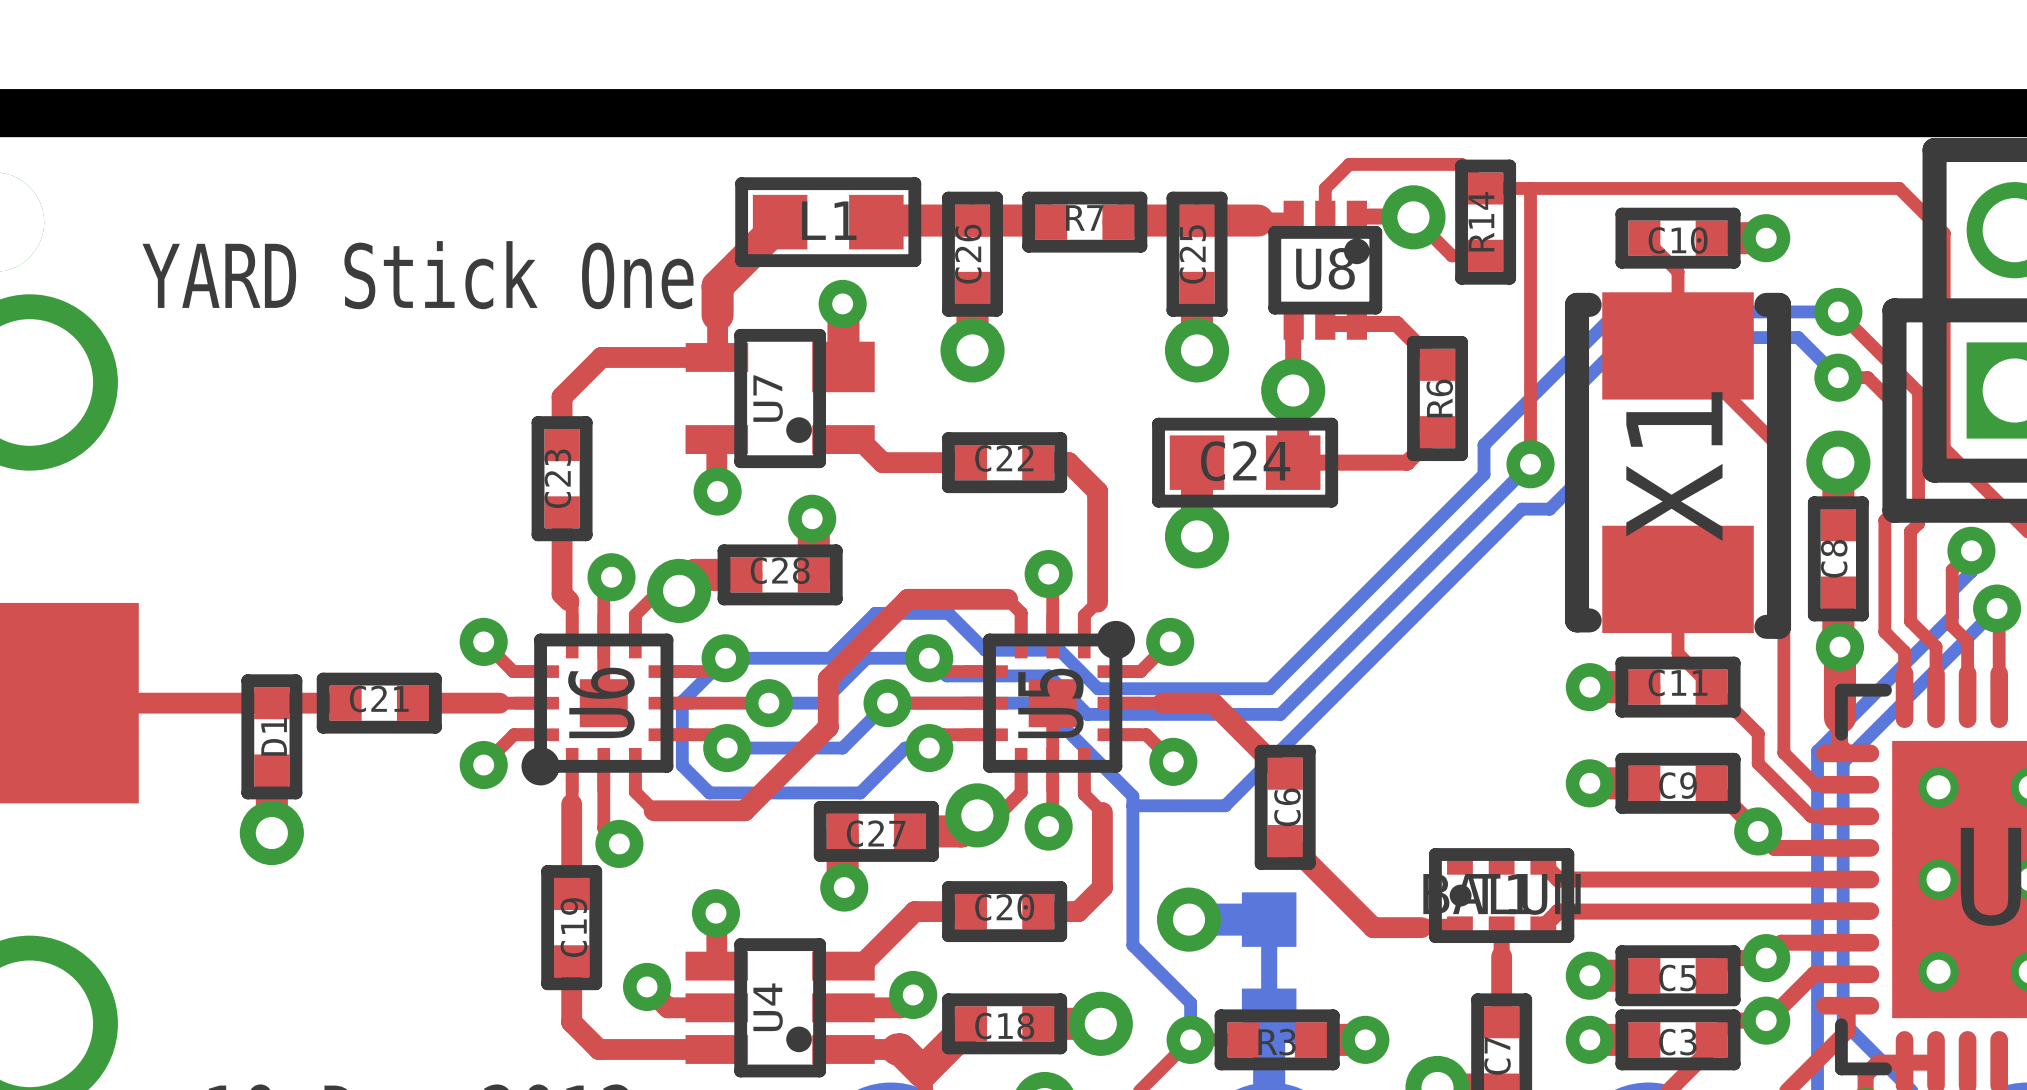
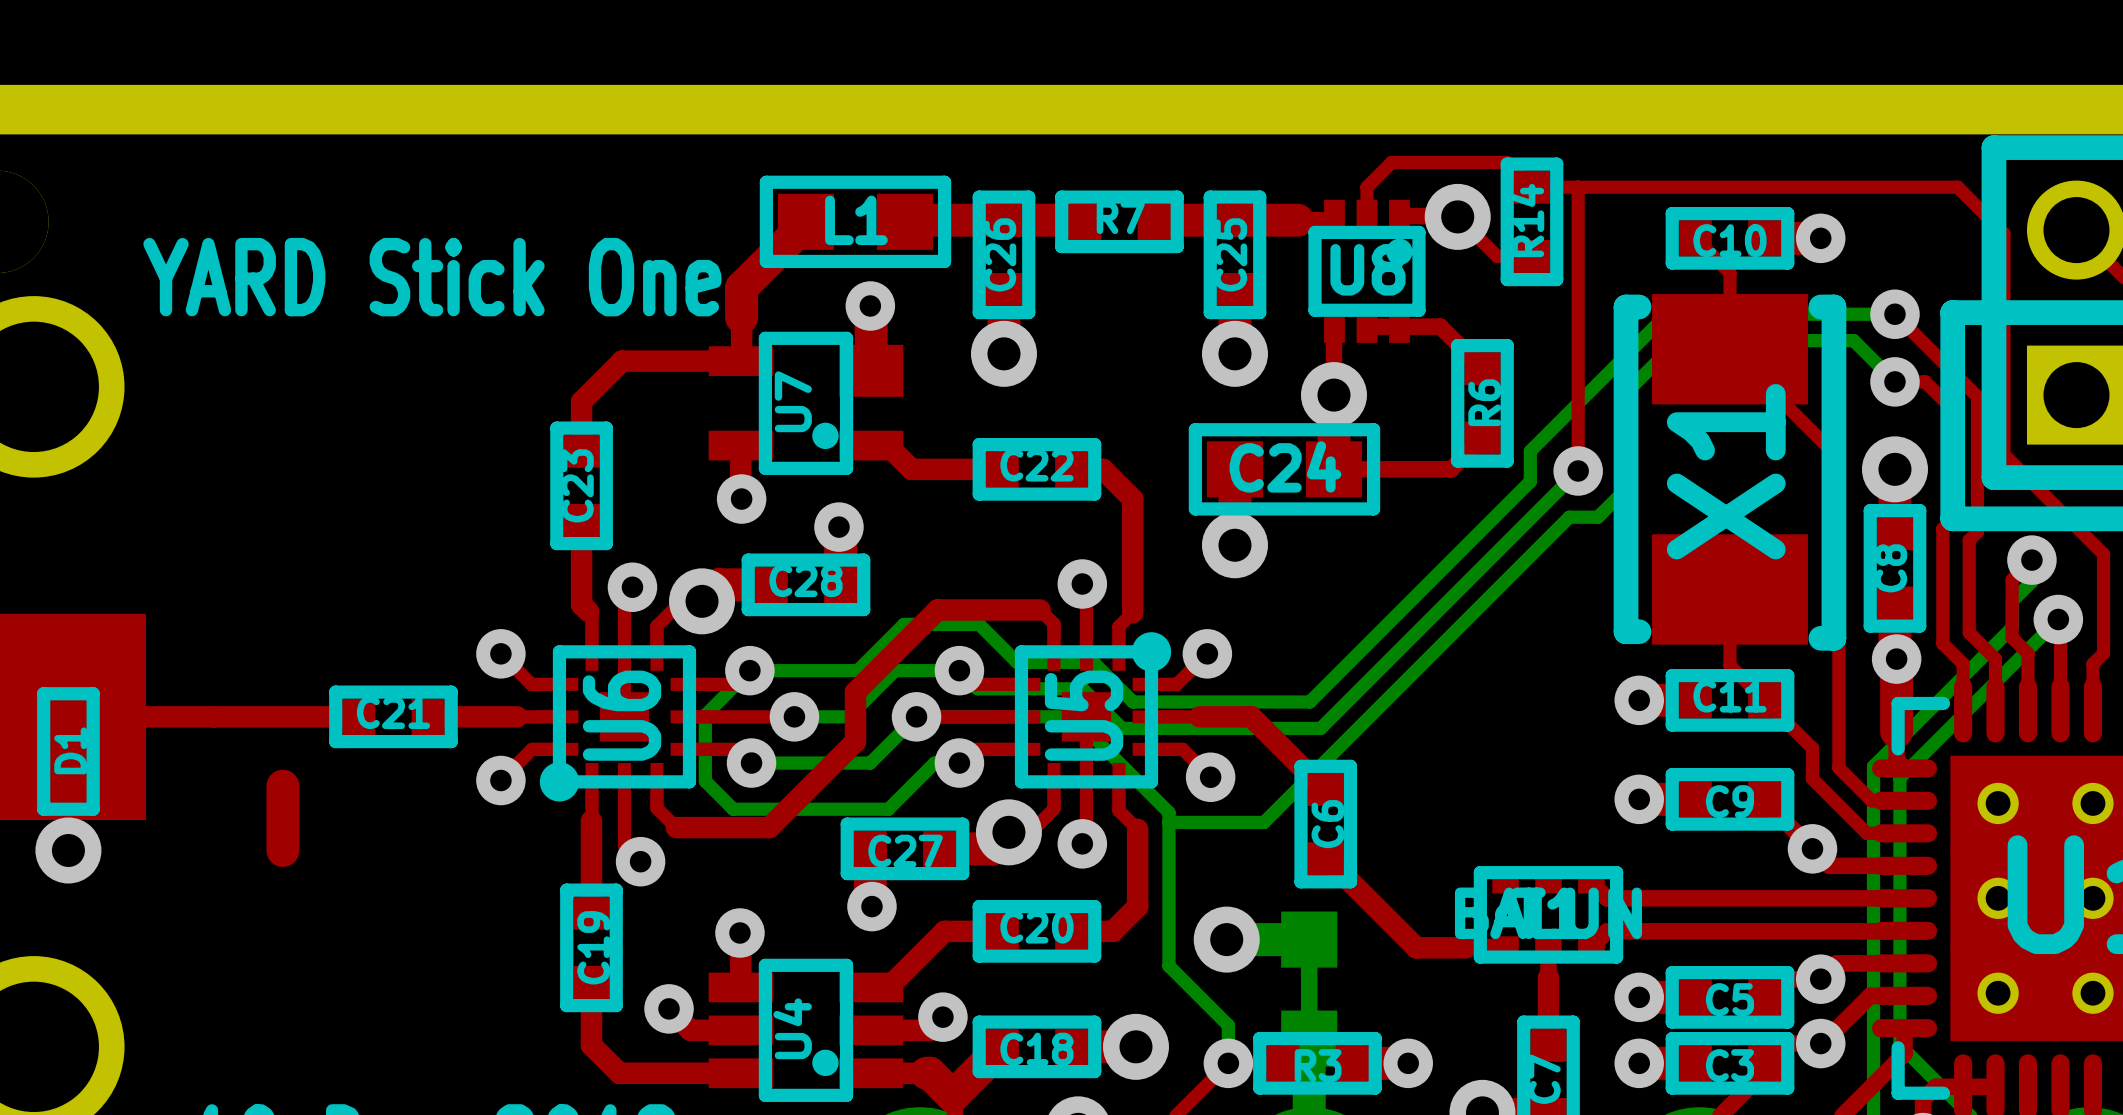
D1 position: (271, 736) -> (68, 751)
via position: (271, 833) -> (68, 850)

